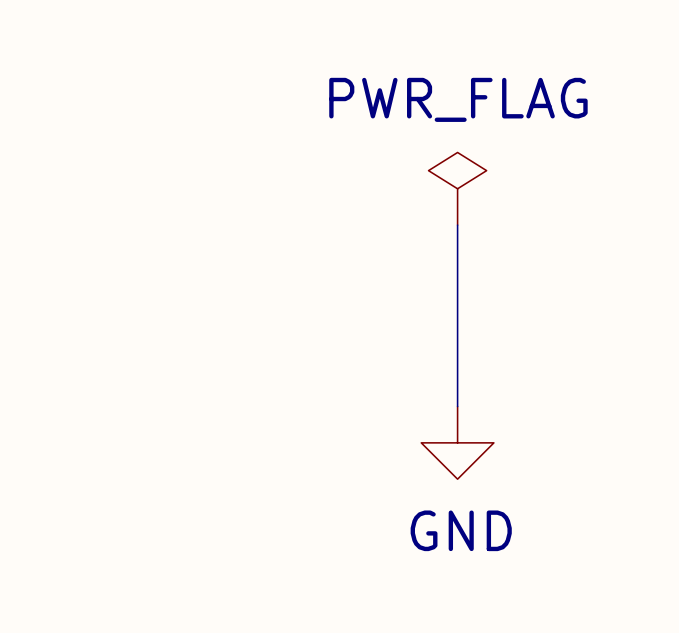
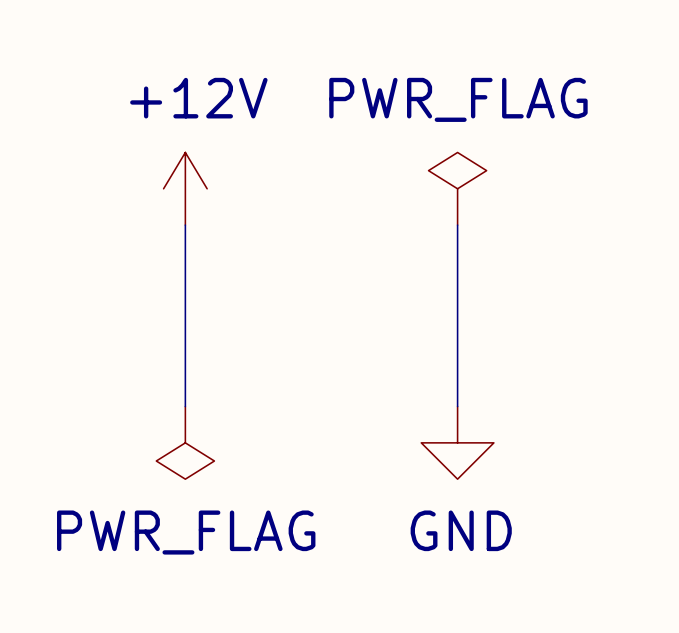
power symbol: none -> +12V (185, 188)
wire: none -> (185, 225) (185, 406)
power symbol: none -> PWR_FLAG (185, 442)

